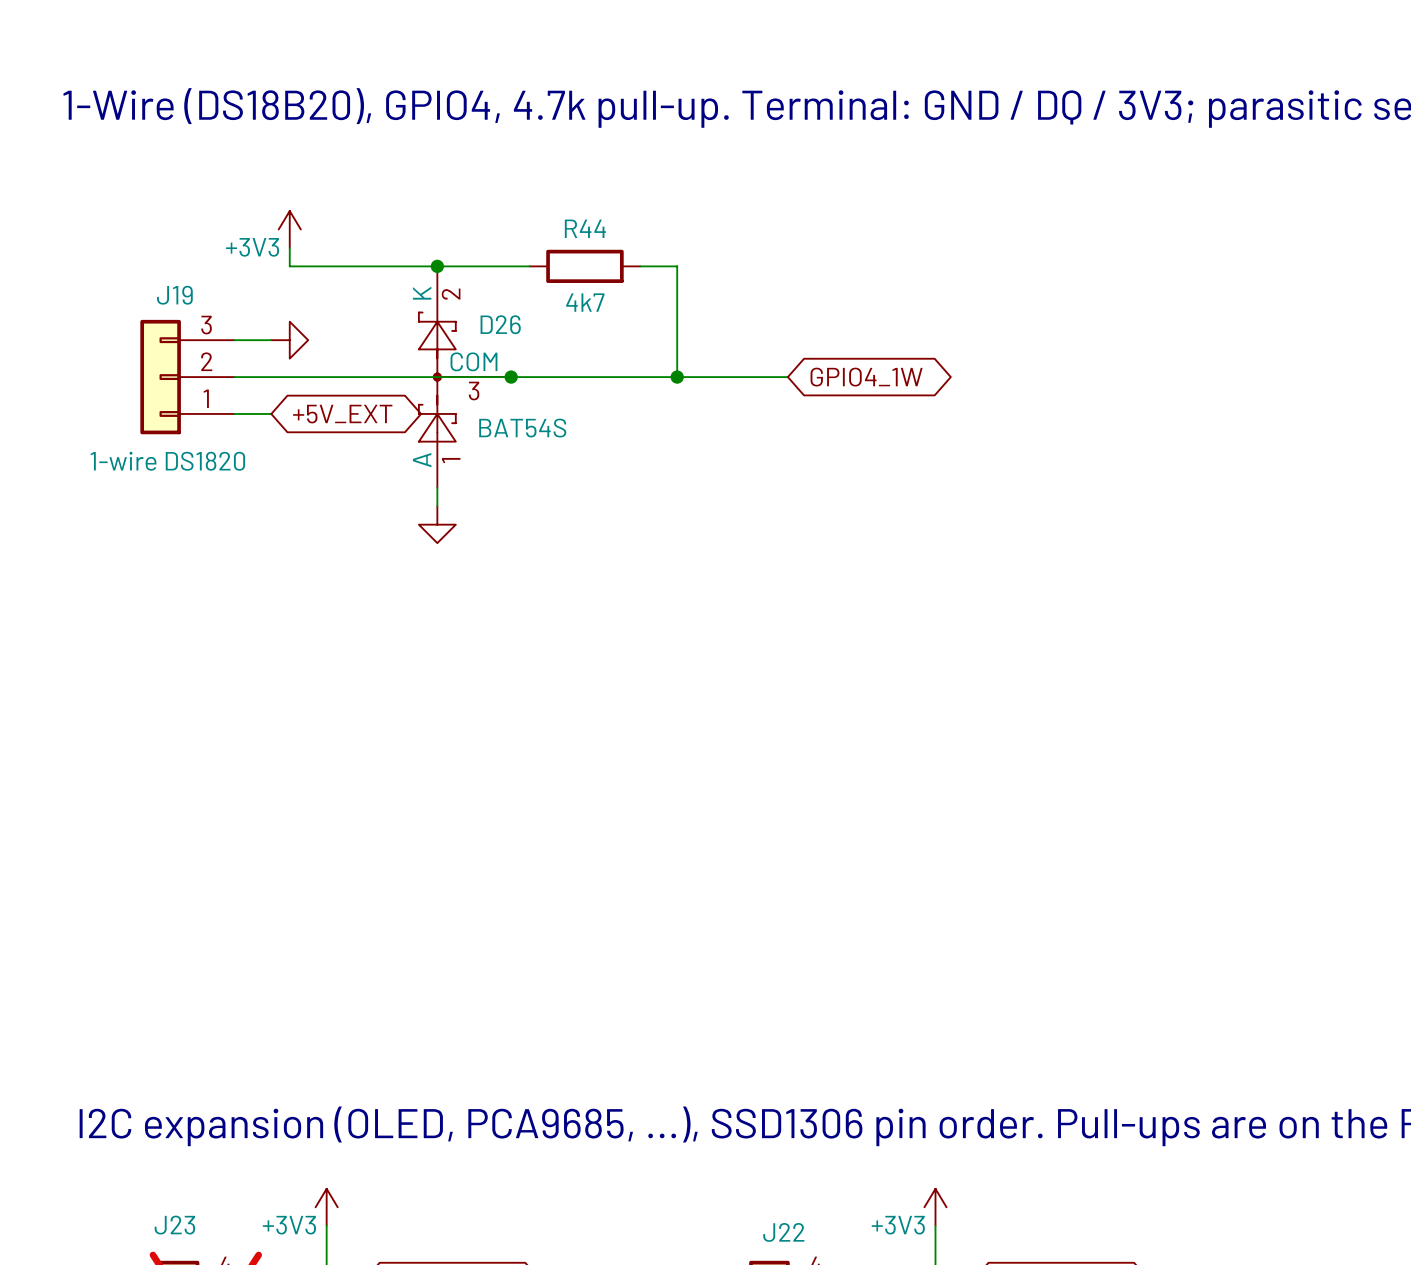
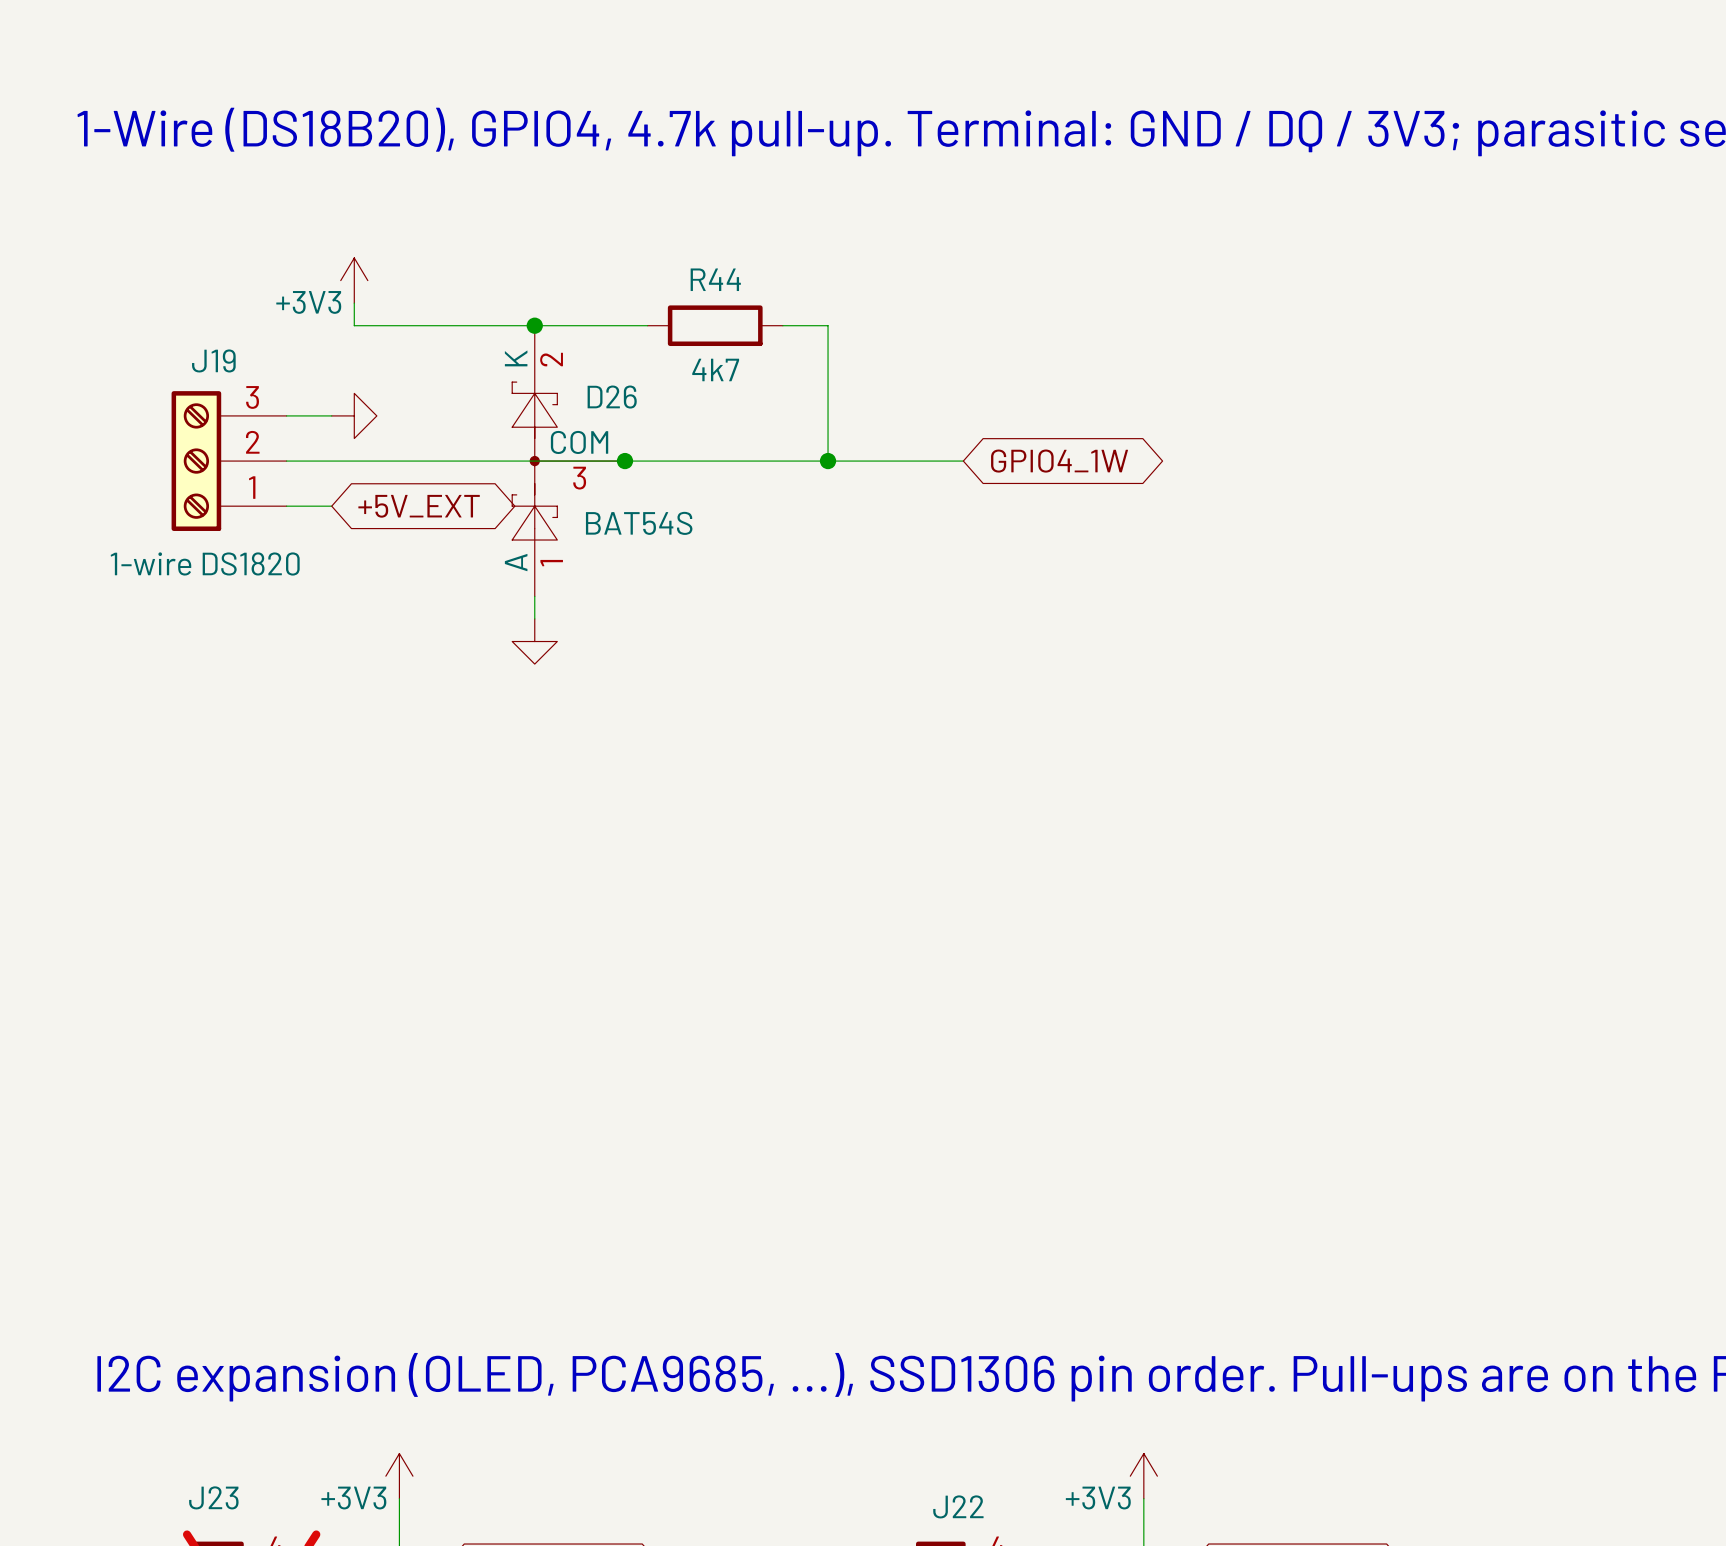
J19 symbol: [140, 319, 235, 435] -> [171, 391, 287, 531]

